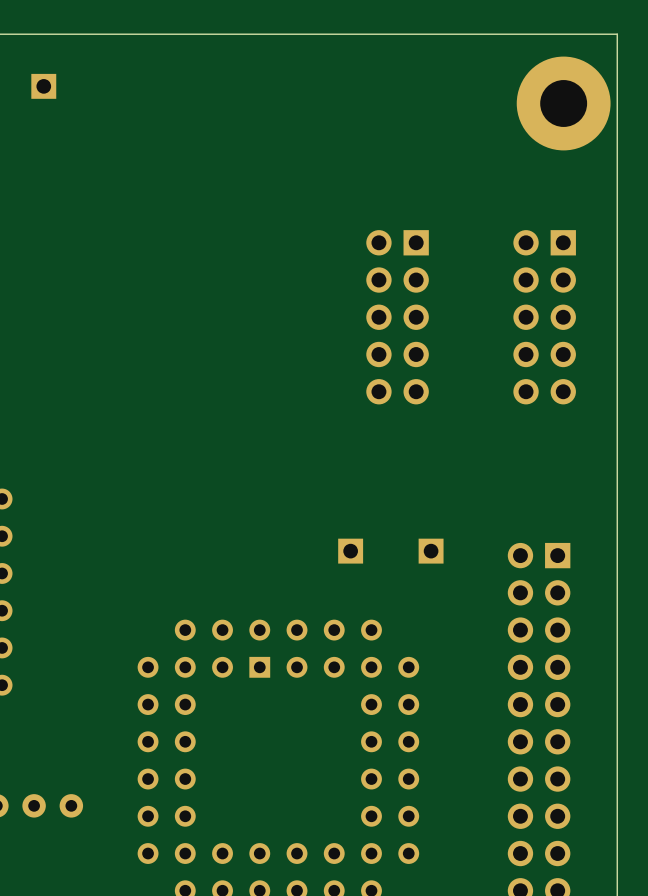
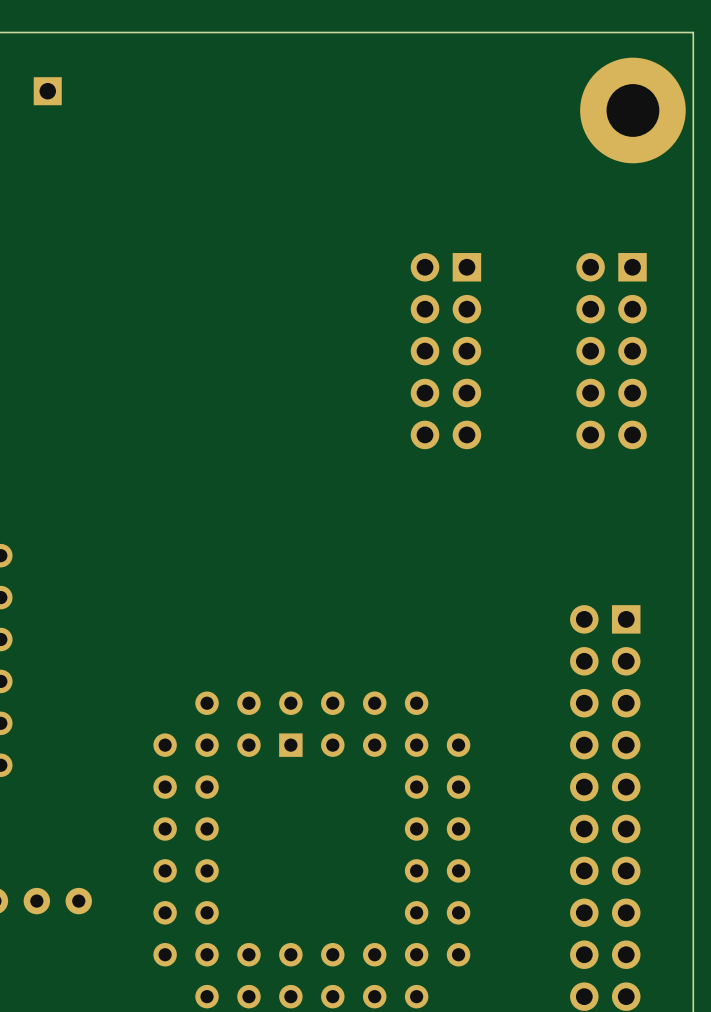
part: (350, 551) -> none
part: (431, 551) -> none

